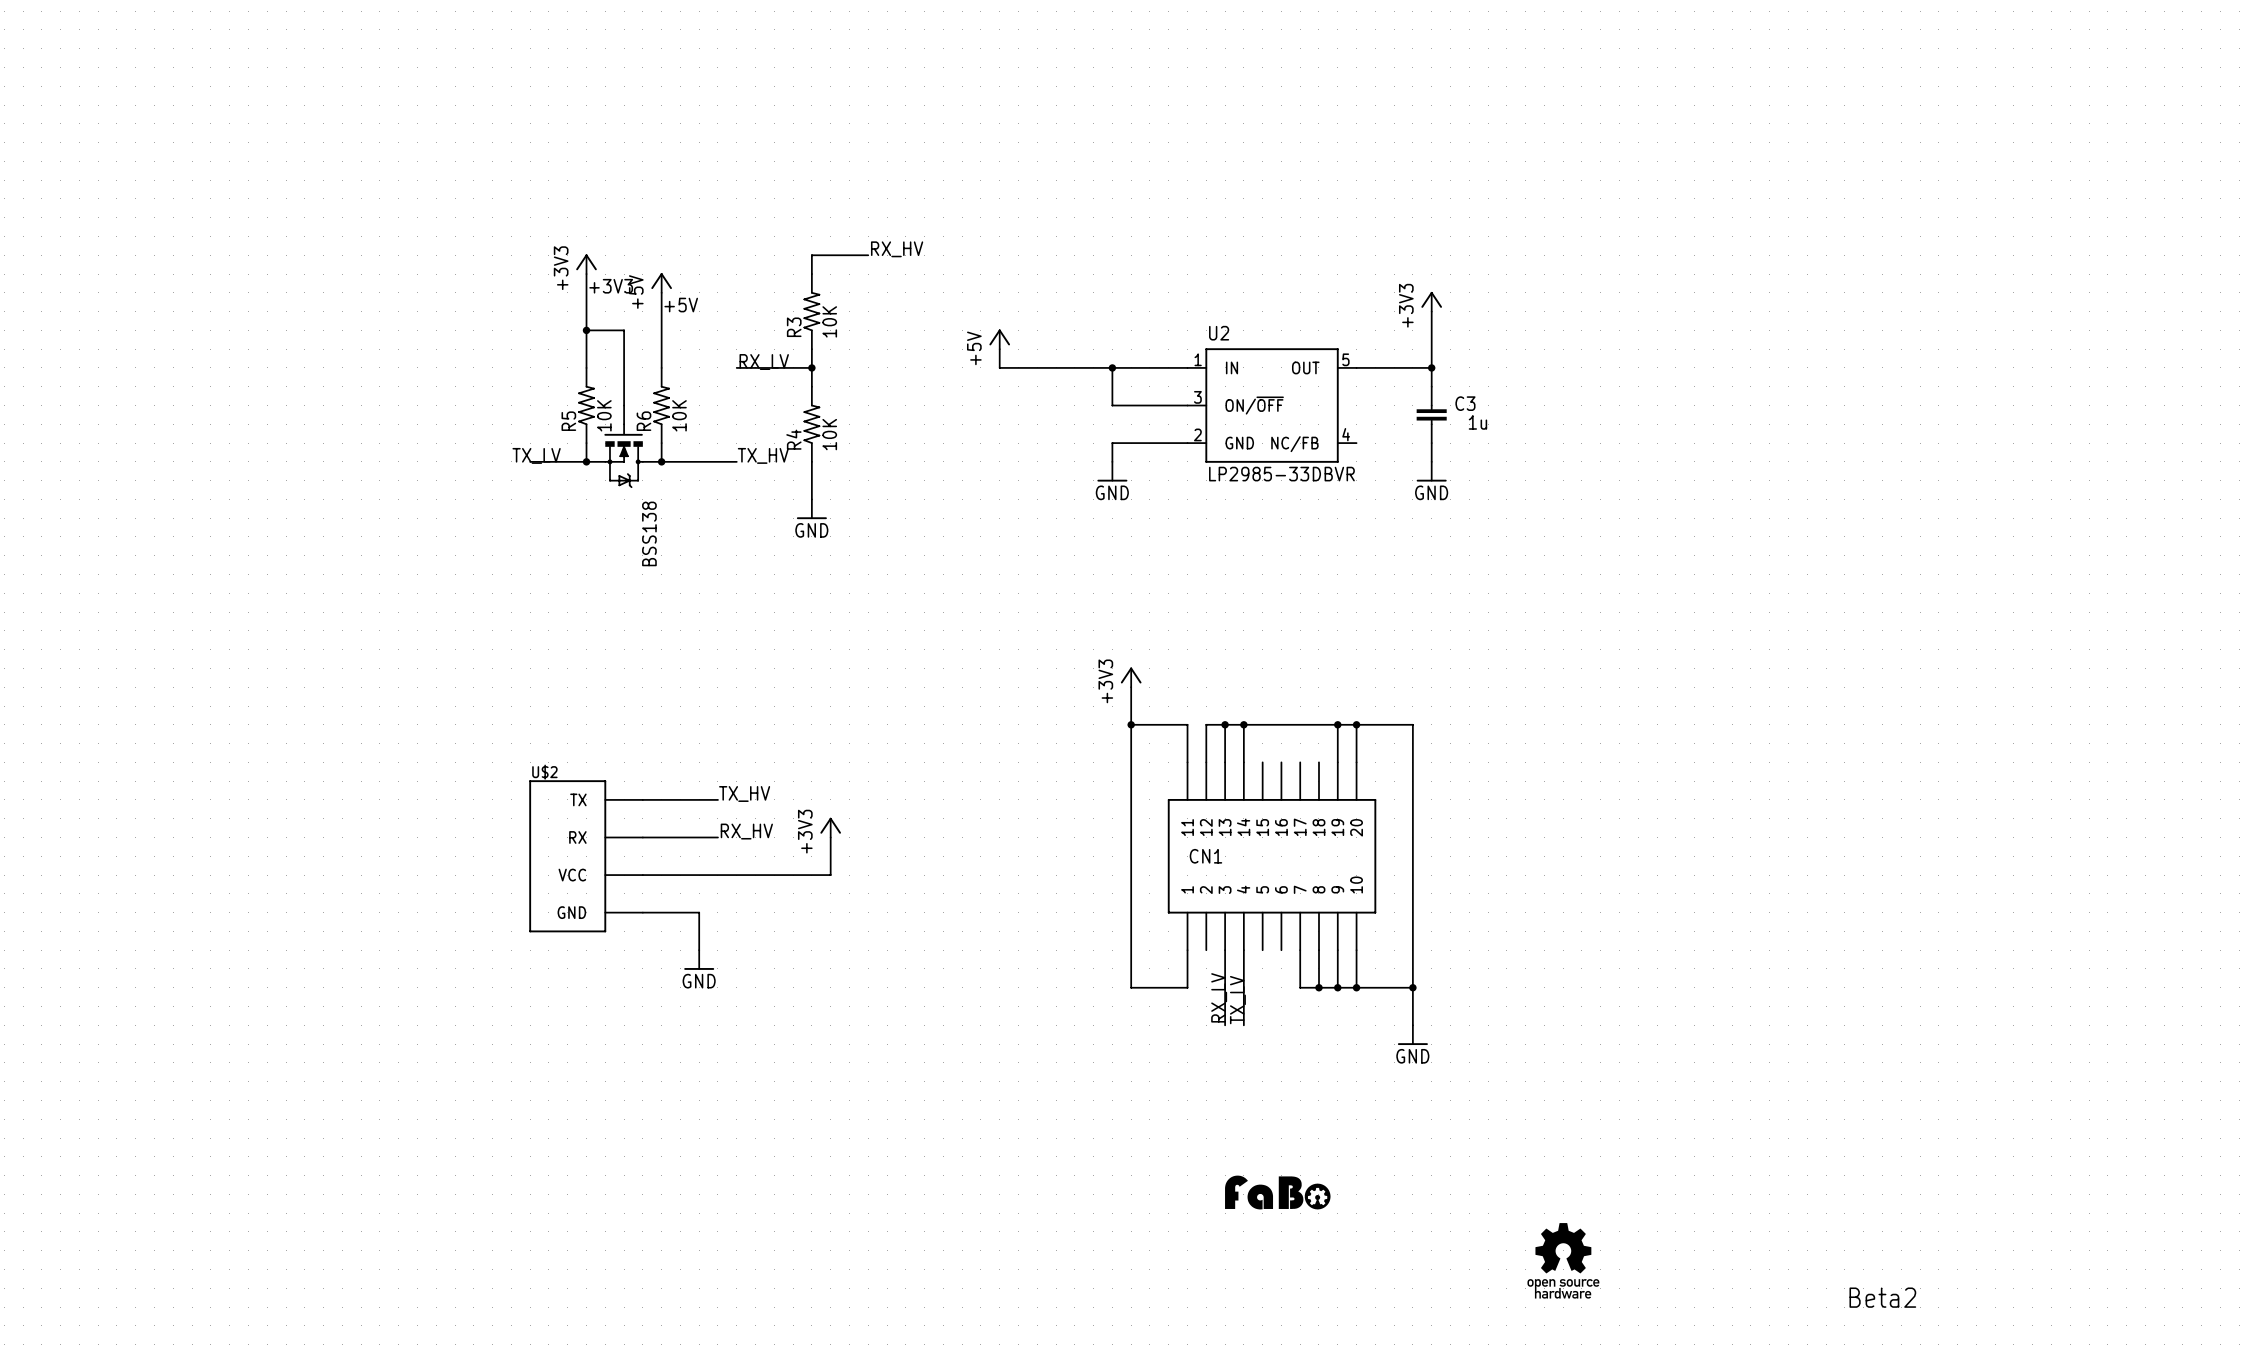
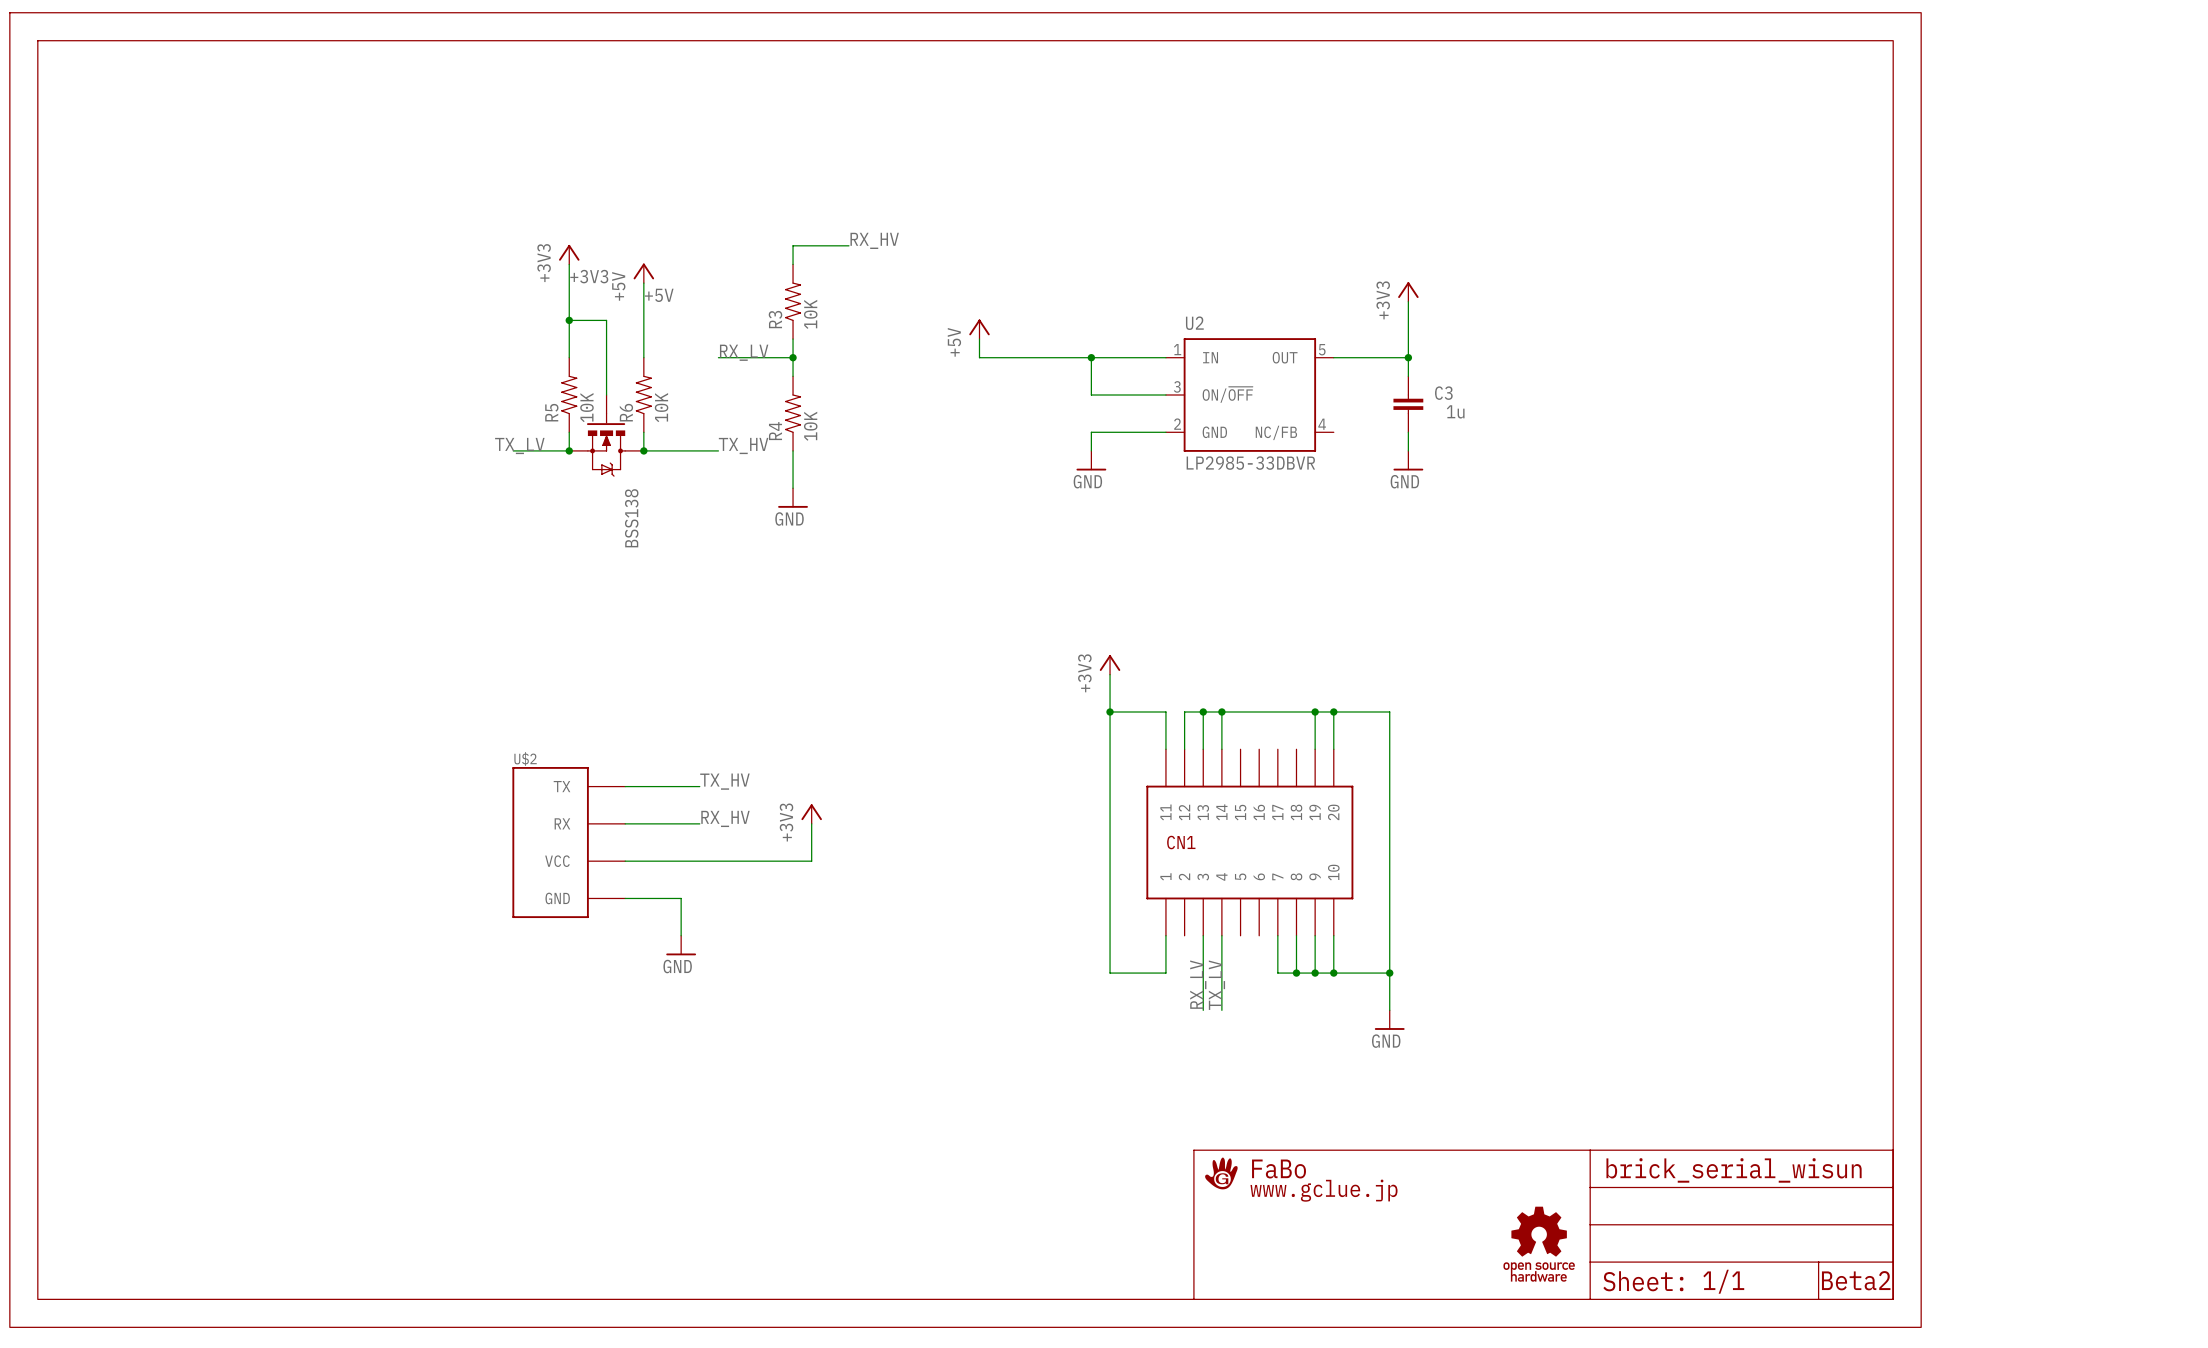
part: none -> (965, 670)
part: (1277, 1192) -> none

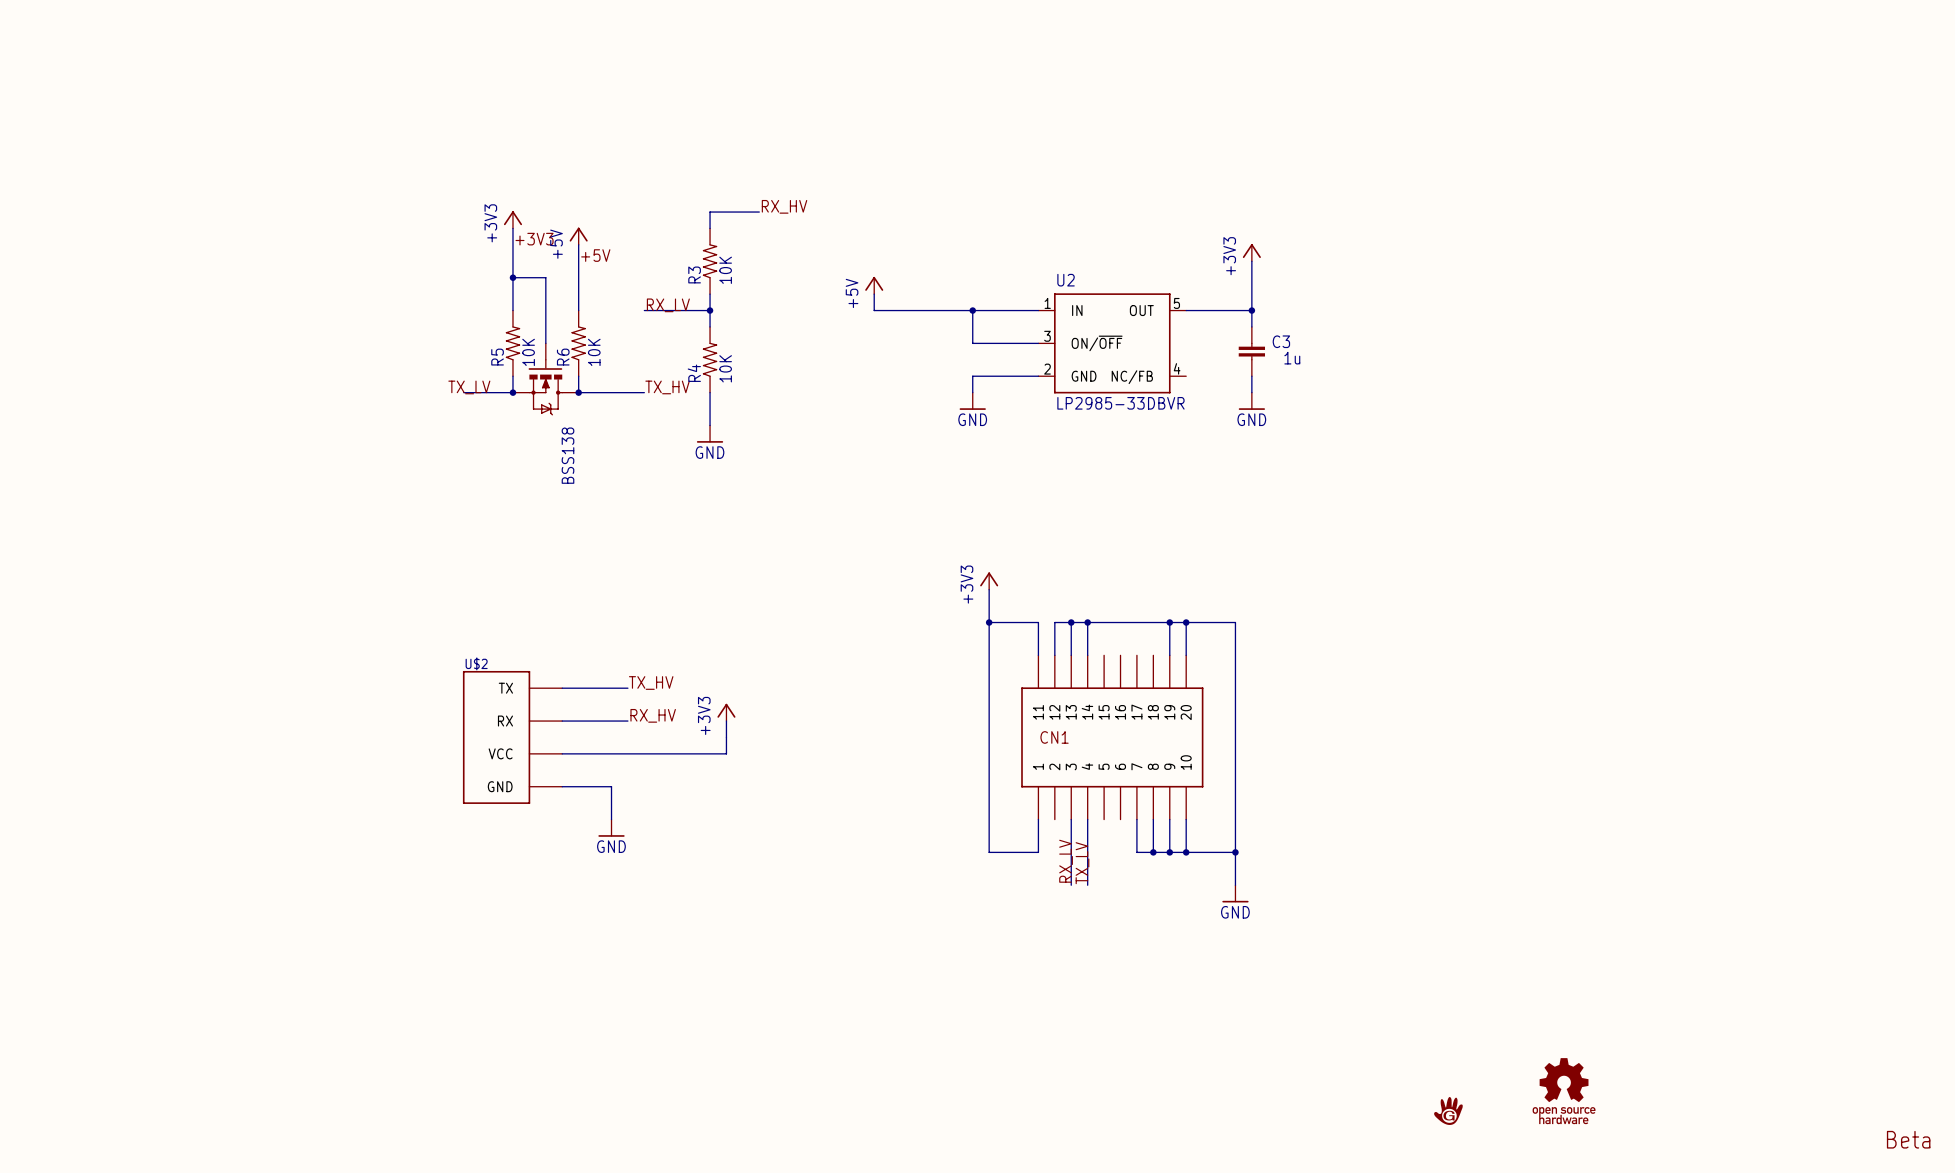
part: (965, 670) -> none
part: (1539, 1244) -> none
part: none -> (1564, 1091)
part: none -> (1448, 1110)
text: Beta2 (1856, 1280) -> none
text: none -> Beta (1908, 1139)

